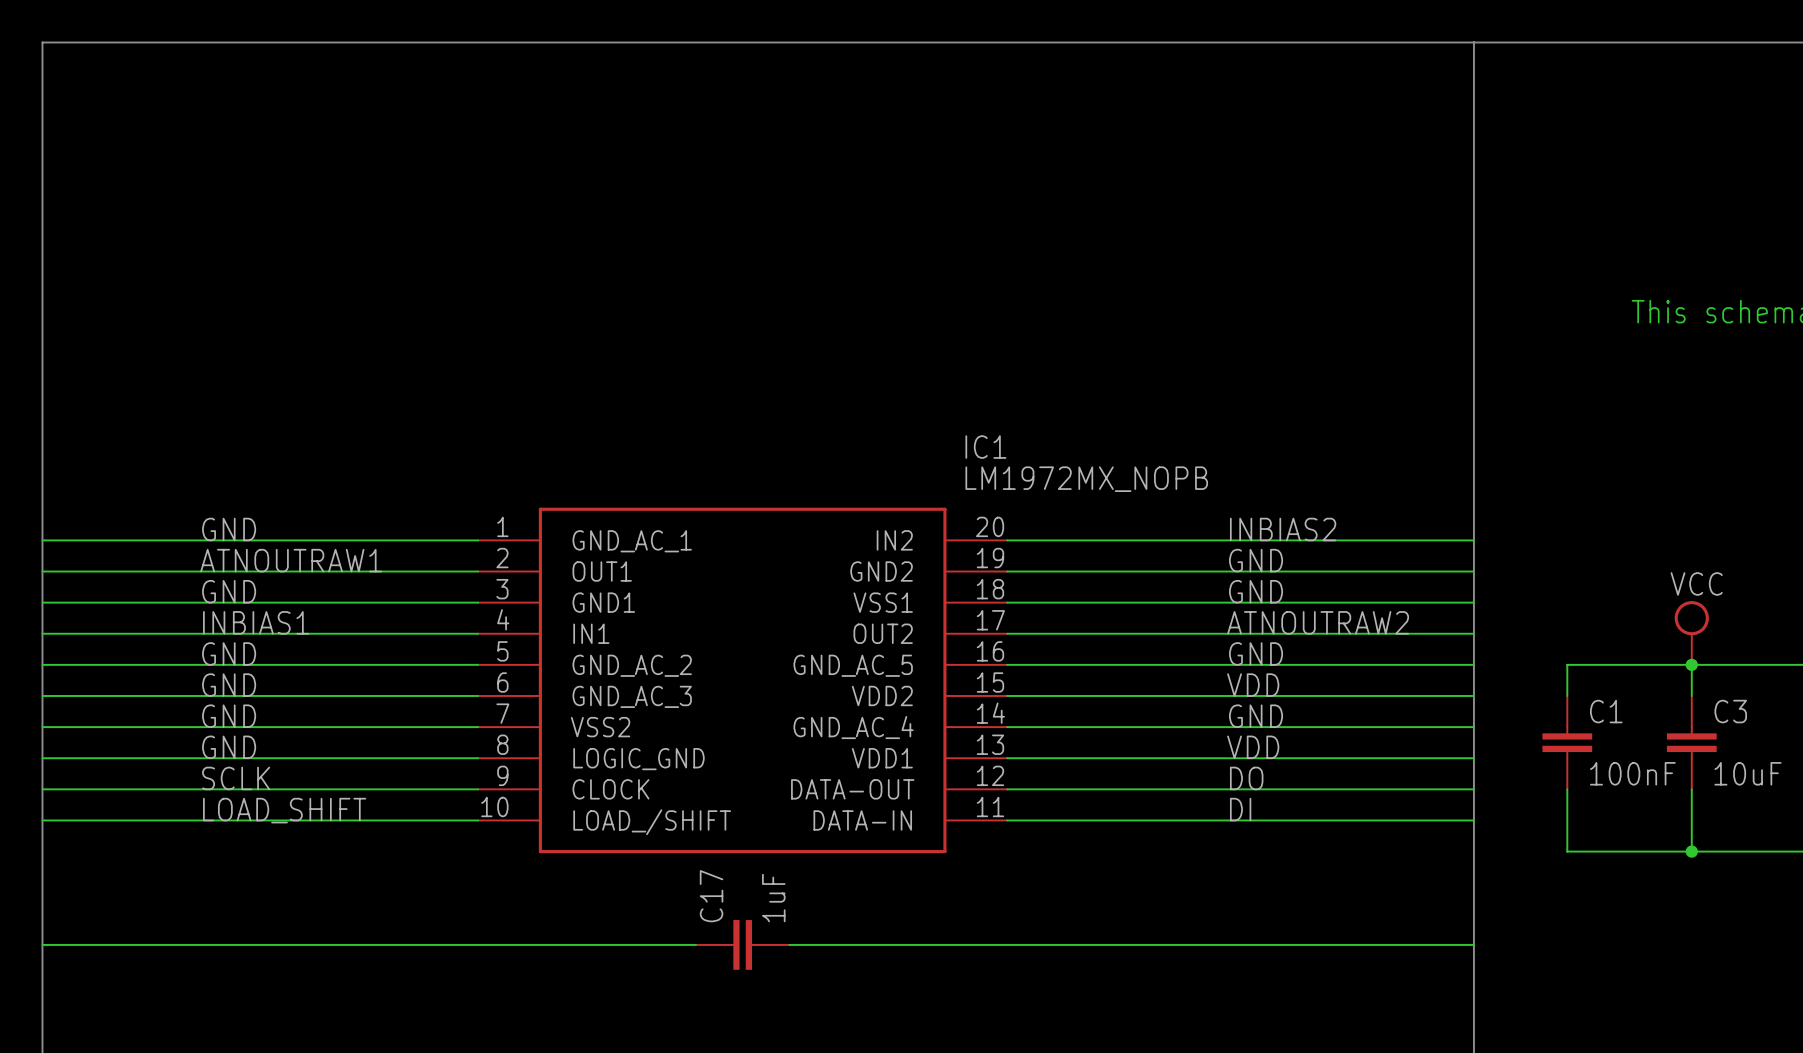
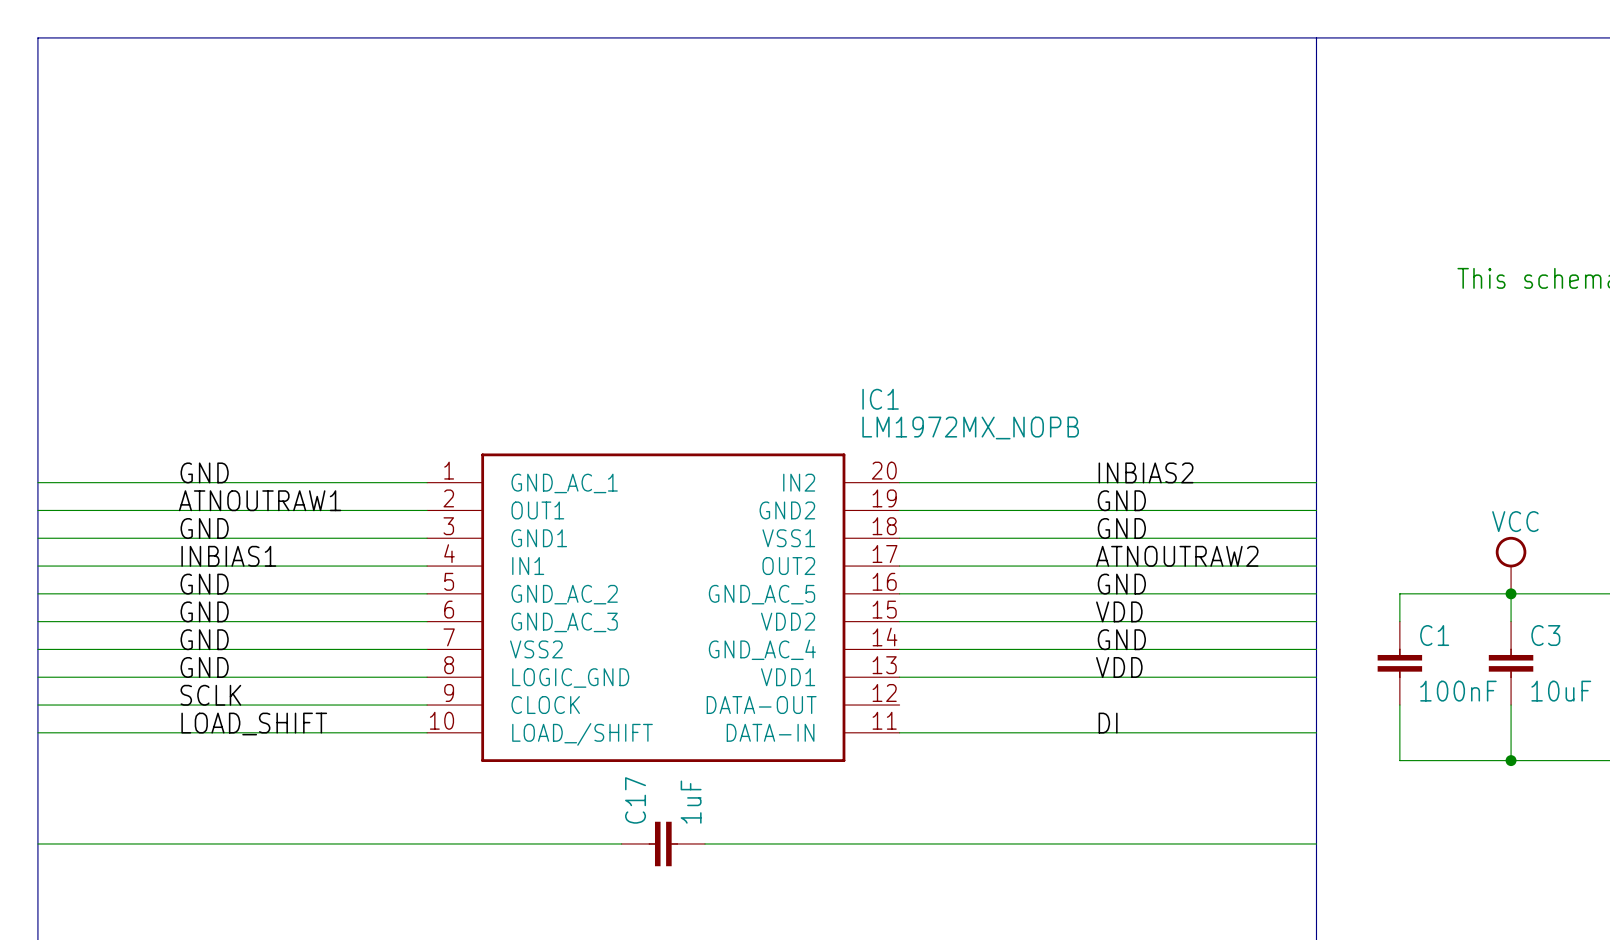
label: DO (1246, 778) -> none
wire: (1007, 789) (1473, 789) -> none

